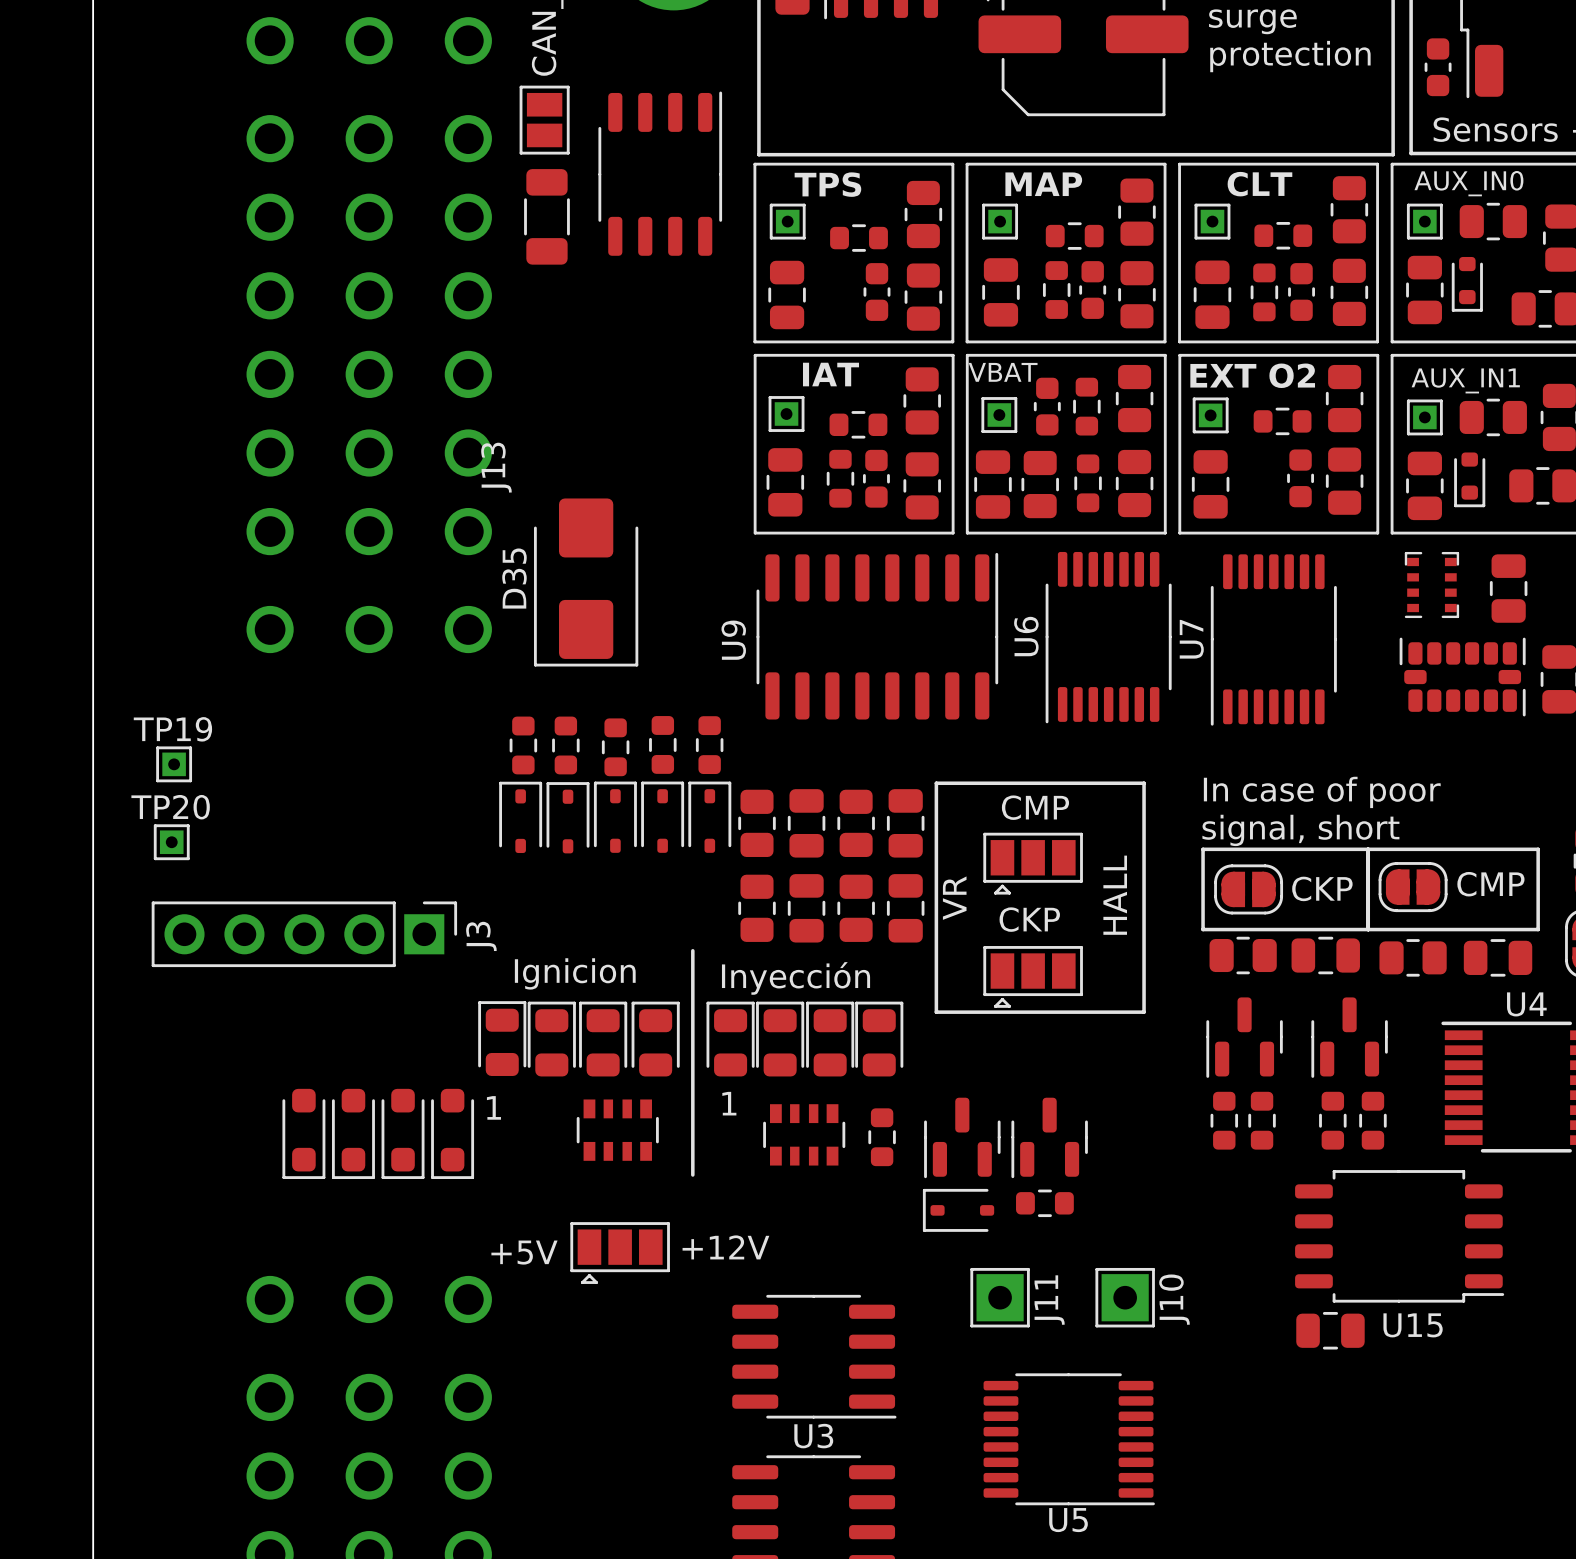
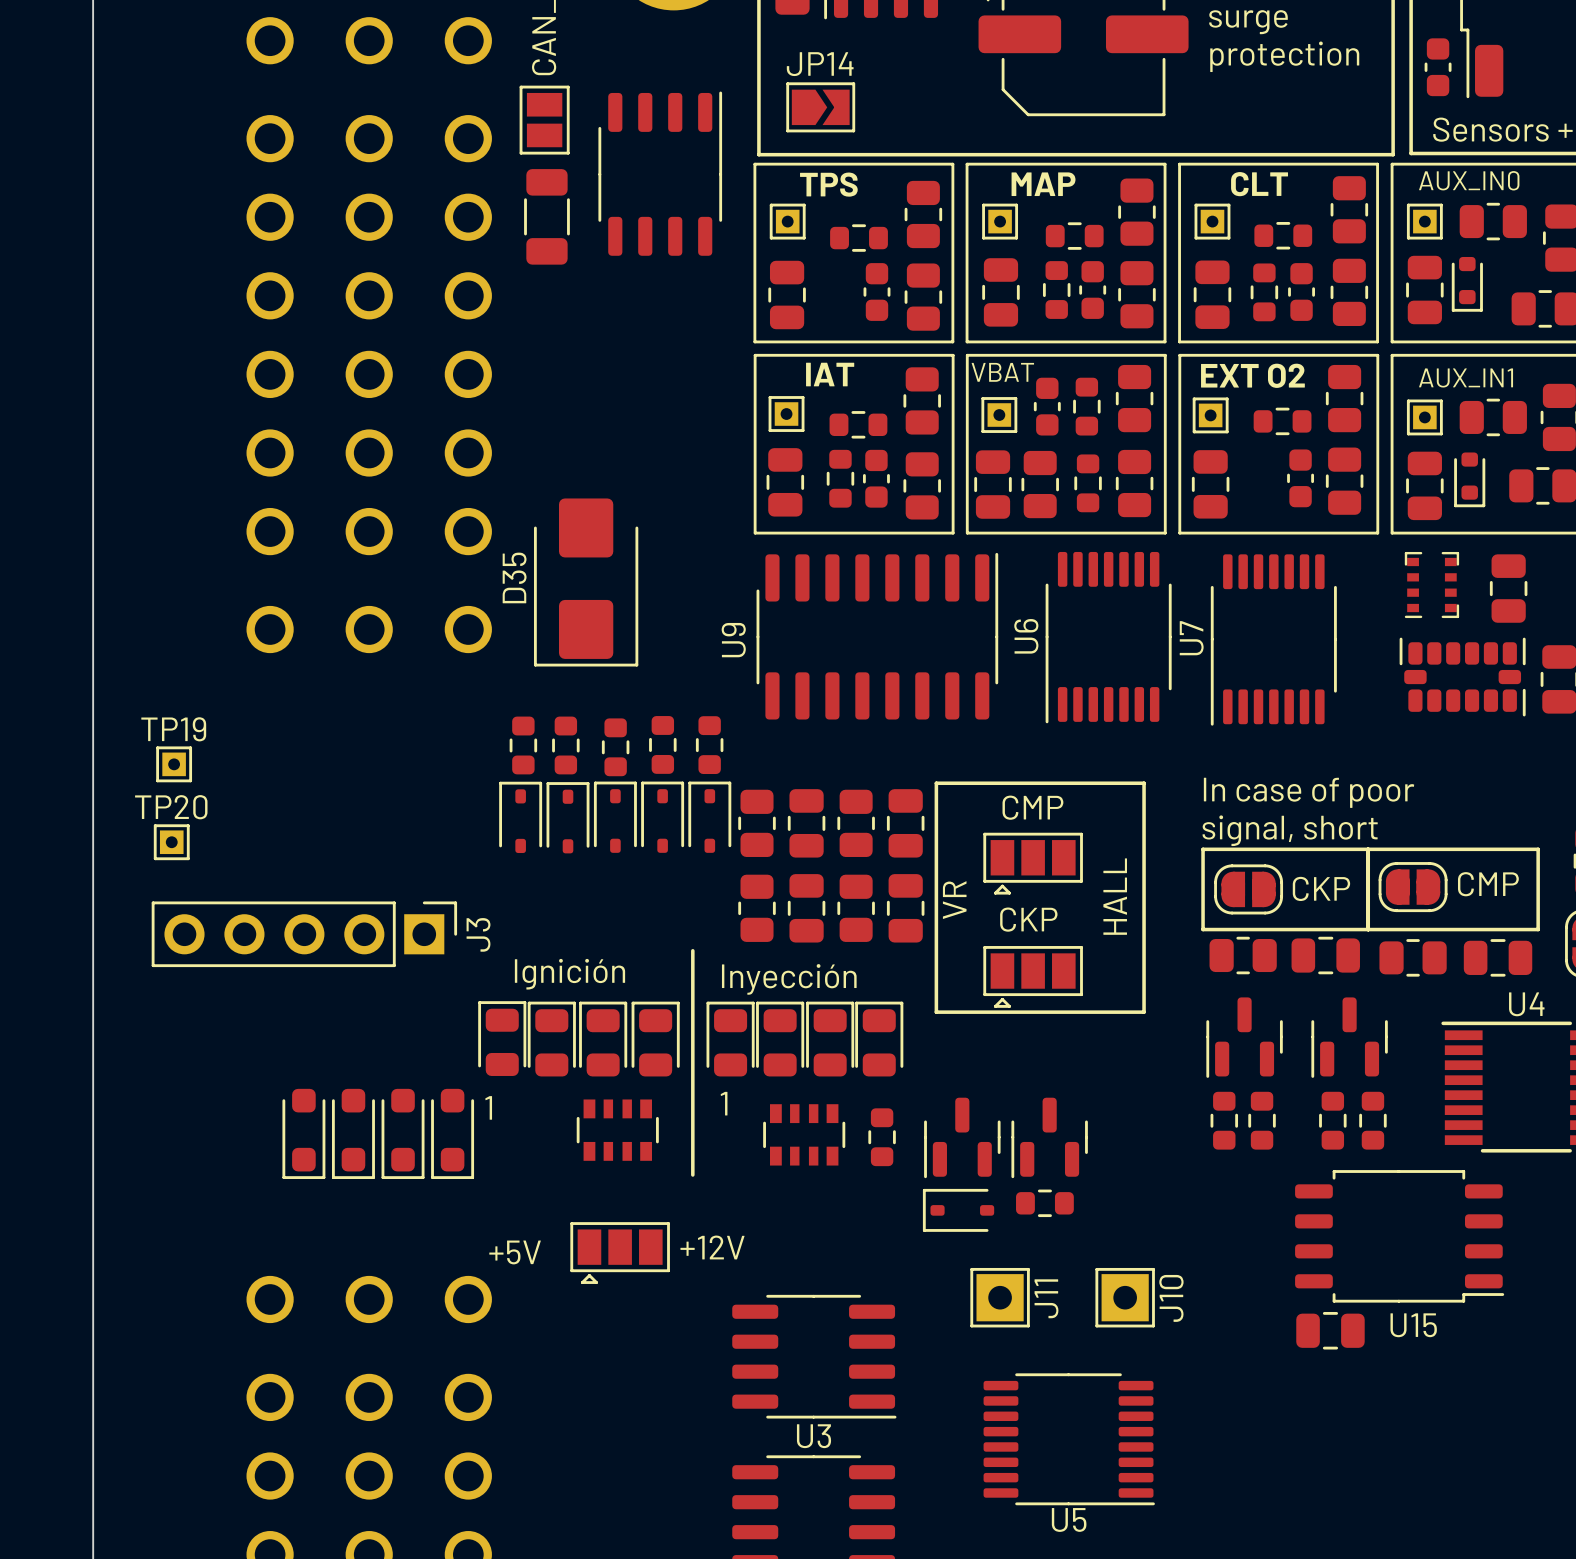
JP14: none -> (820, 107)
J13 name: J13 (496, 467) -> none
text: Ignicion (575, 973) -> Ignición (569, 974)

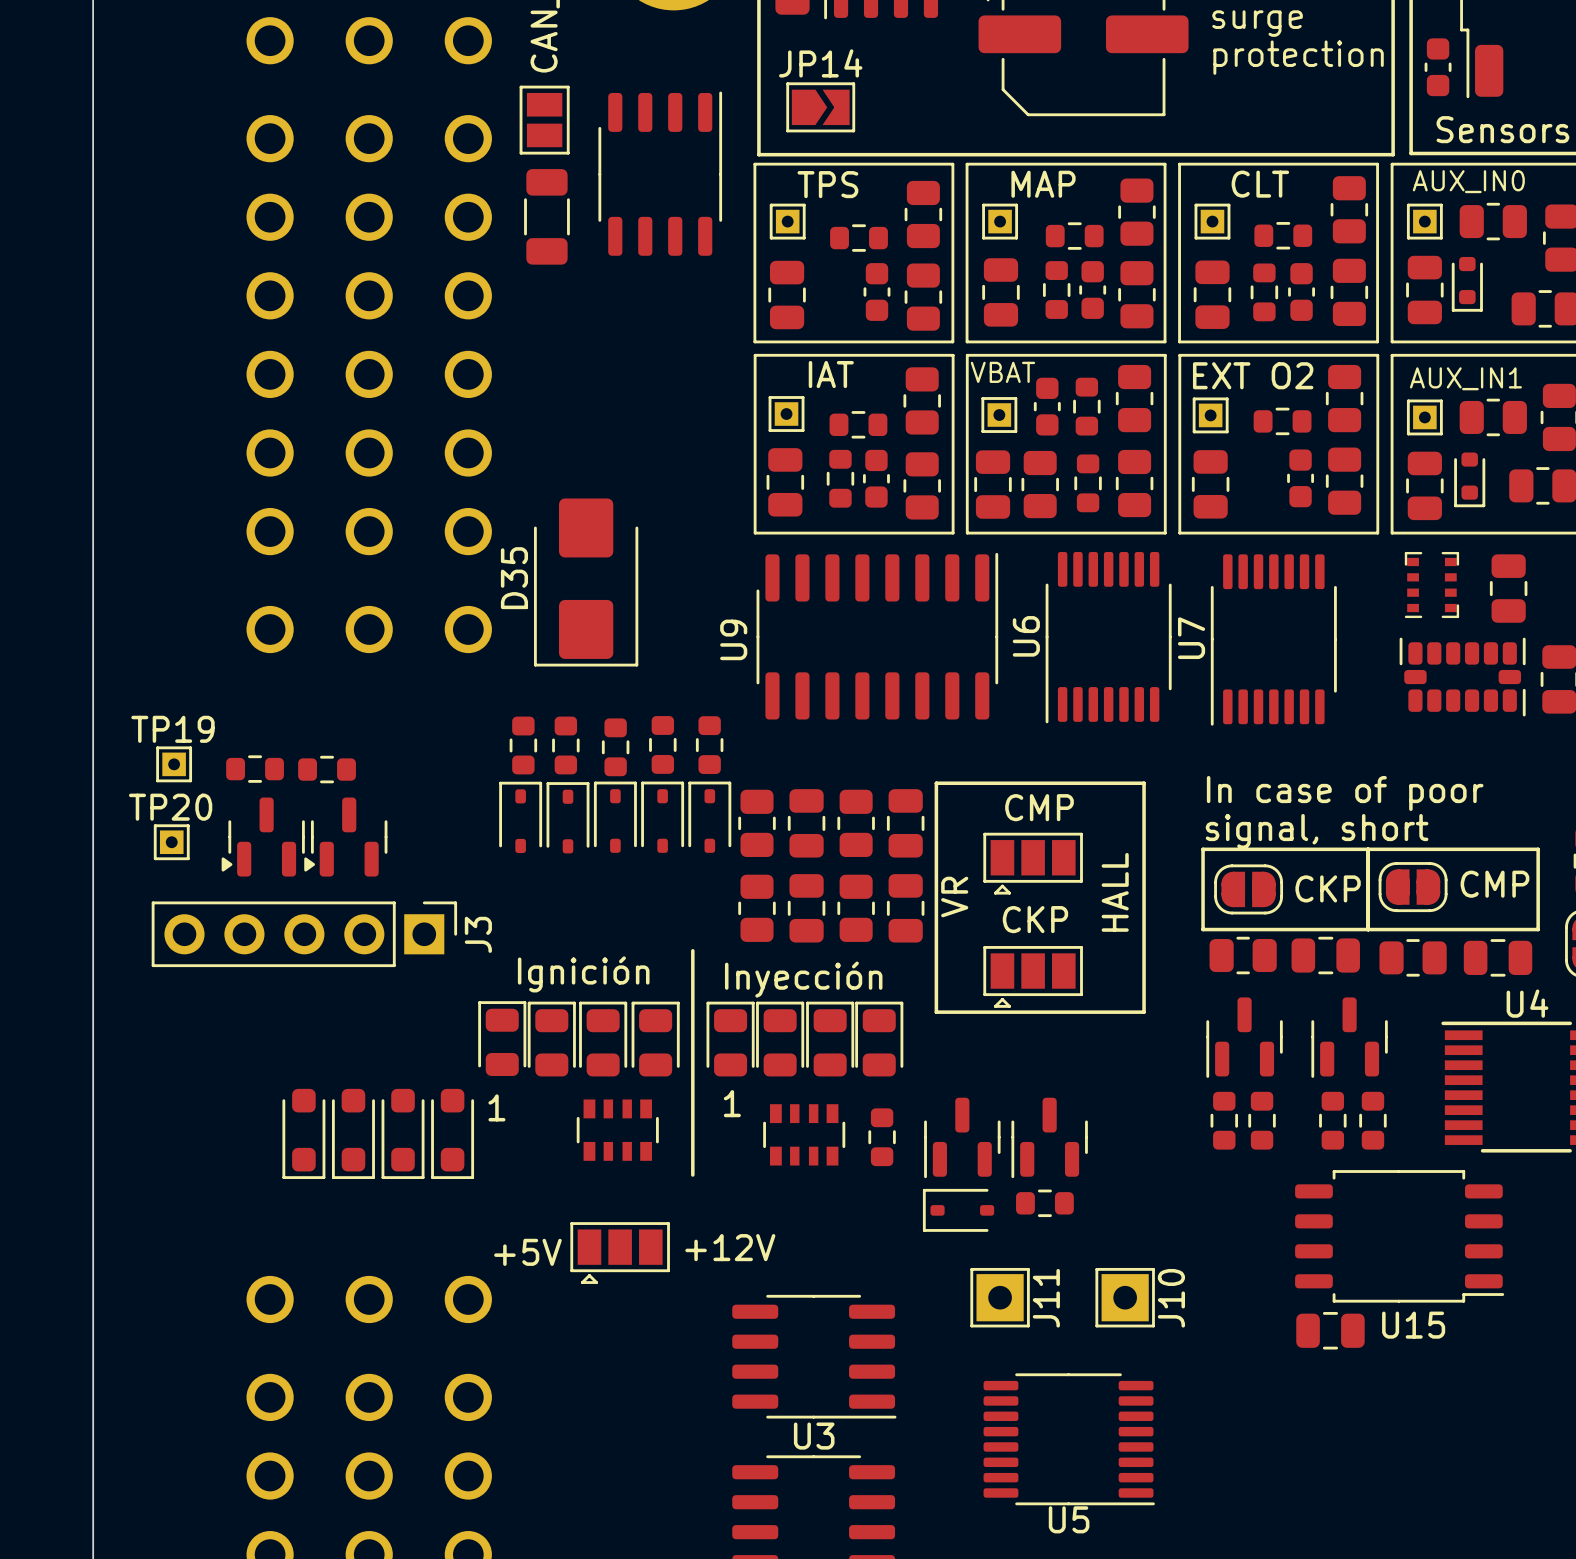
part: none -> (255, 769)
part: none -> (327, 769)
part: none -> (263, 837)
part: none -> (345, 837)

